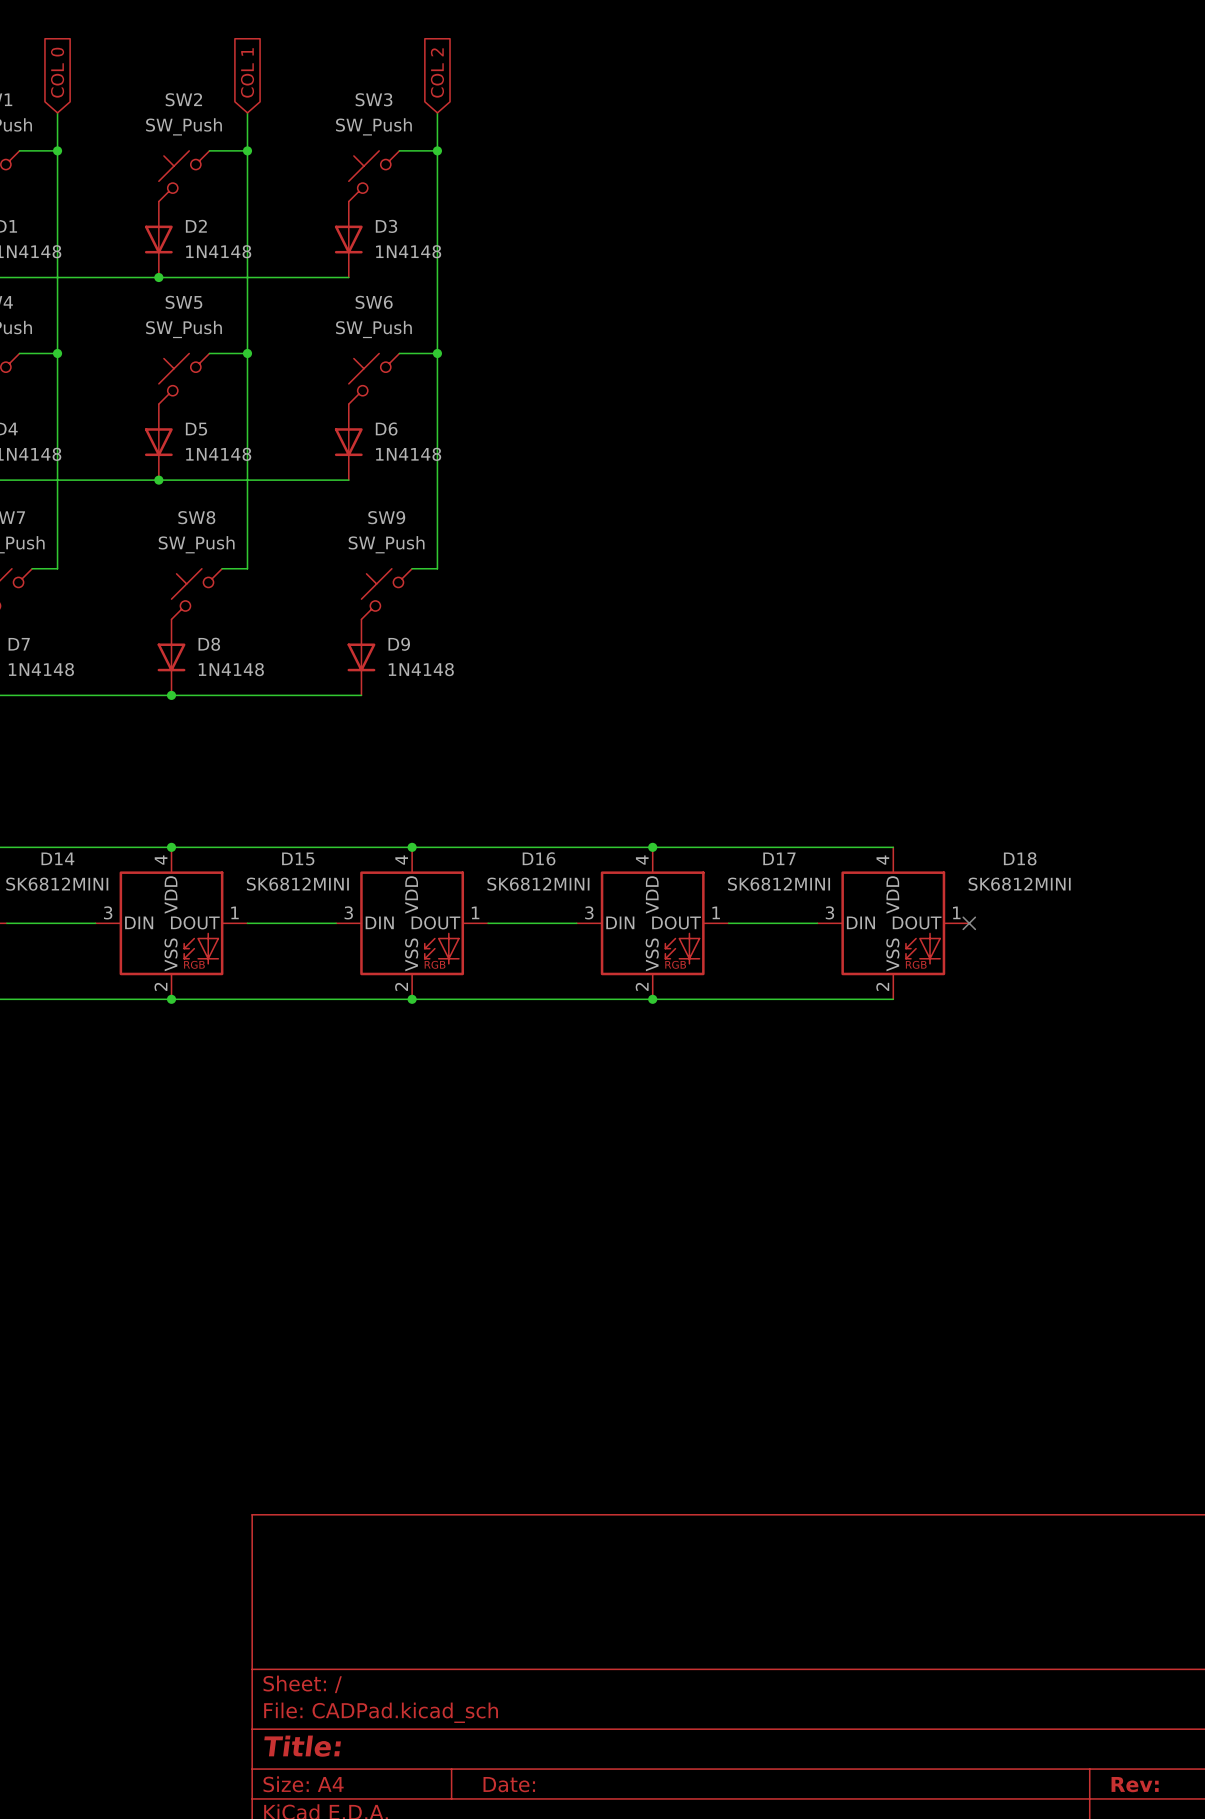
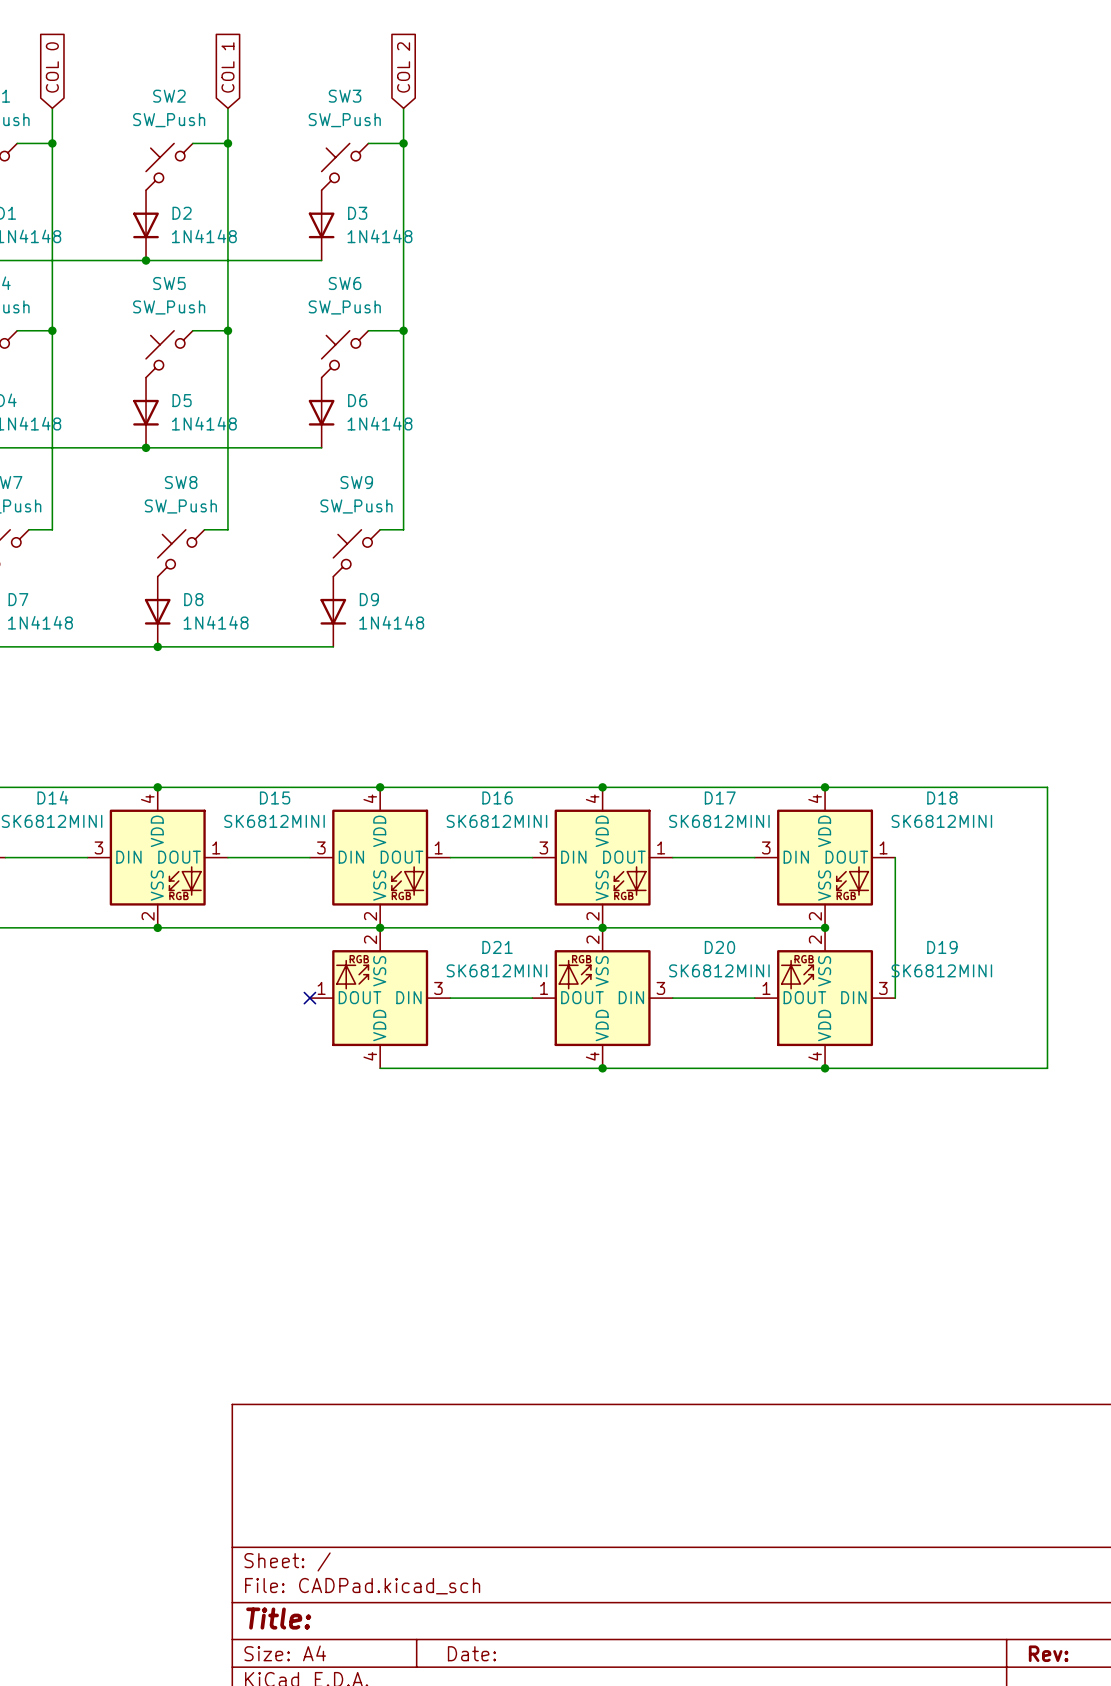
wire: none -> (825, 787) (1047, 787) (1047, 1068) (380, 1068)
junction: none -> (825, 787)
wire: none -> (895, 857) (895, 998)
no-connect mark: (969, 923) -> none
junction: none -> (825, 927)
no-connect mark: none -> (309, 998)
D21: none -> SK6812MINI (380, 998)
wire: none -> (450, 998) (532, 998)
D20: none -> SK6812MINI (602, 998)
wire: none -> (672, 998) (754, 998)
D19: none -> SK6812MINI (825, 998)
junction: none -> (602, 1068)
junction: none -> (825, 1068)

